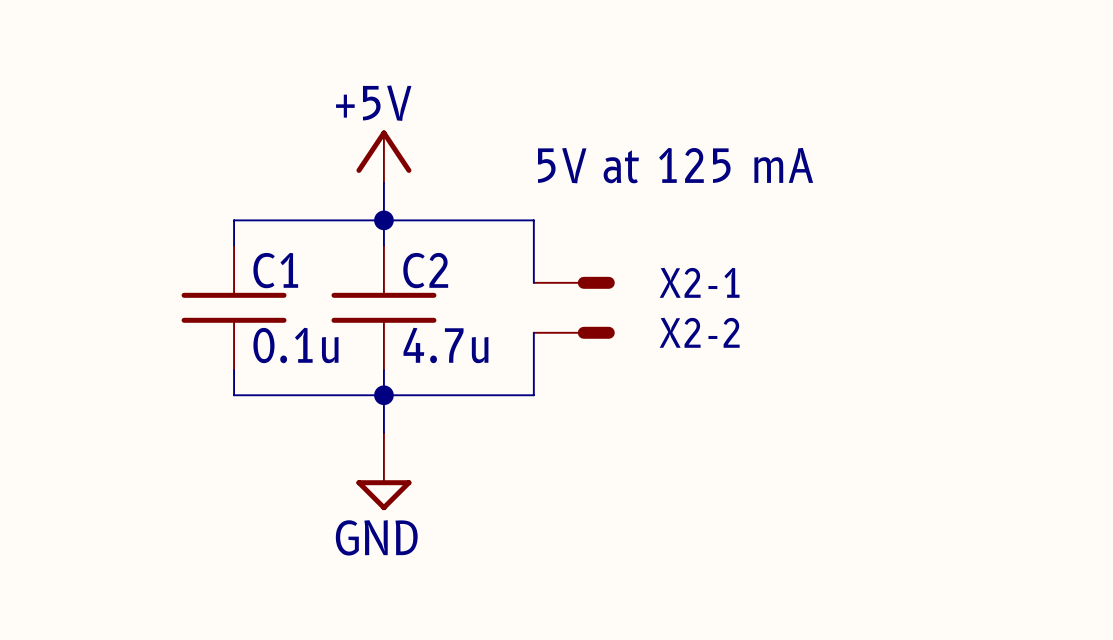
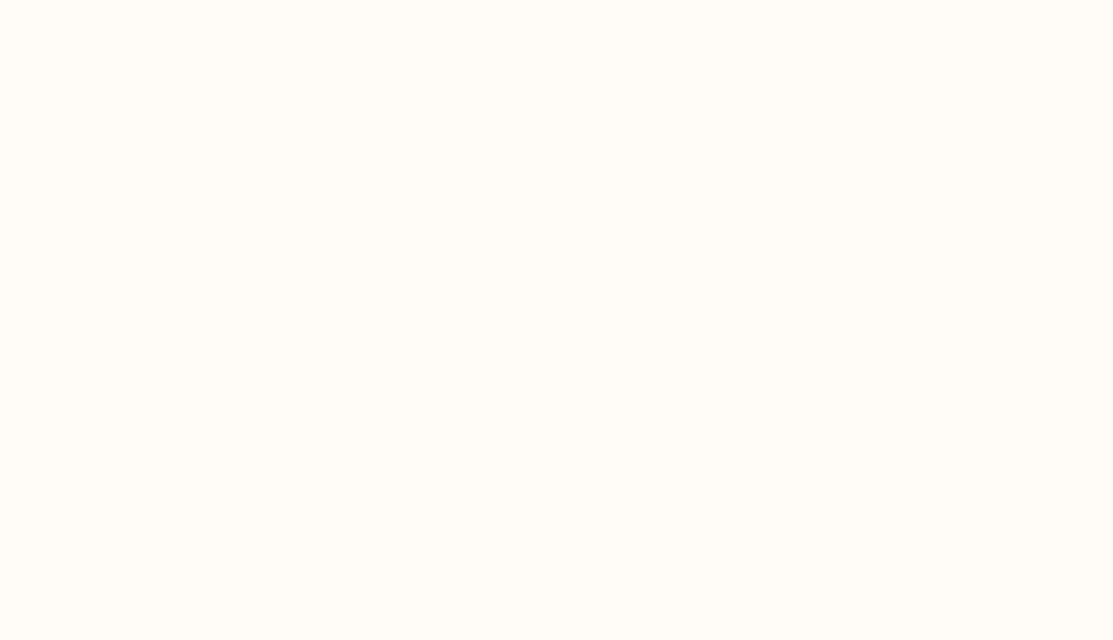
power symbol: +5V (383, 156) -> none
text: 5V at 125 mA (675, 165) -> none
wire: (383, 182) (383, 245) -> none
junction: (383, 220) -> none
wire: (234, 245) (234, 220) (533, 220) (533, 282) -> none
X2-1: (574, 282) -> none
C1: 0.1u (234, 307) -> none
C2: 4.7u (383, 307) -> none
wire: (533, 332) (533, 395) (234, 395) (234, 370) -> none
X2-2: (574, 332) -> none
wire: (383, 370) (383, 432) -> none
junction: (383, 395) -> none
power symbol: GND (383, 471) -> none

